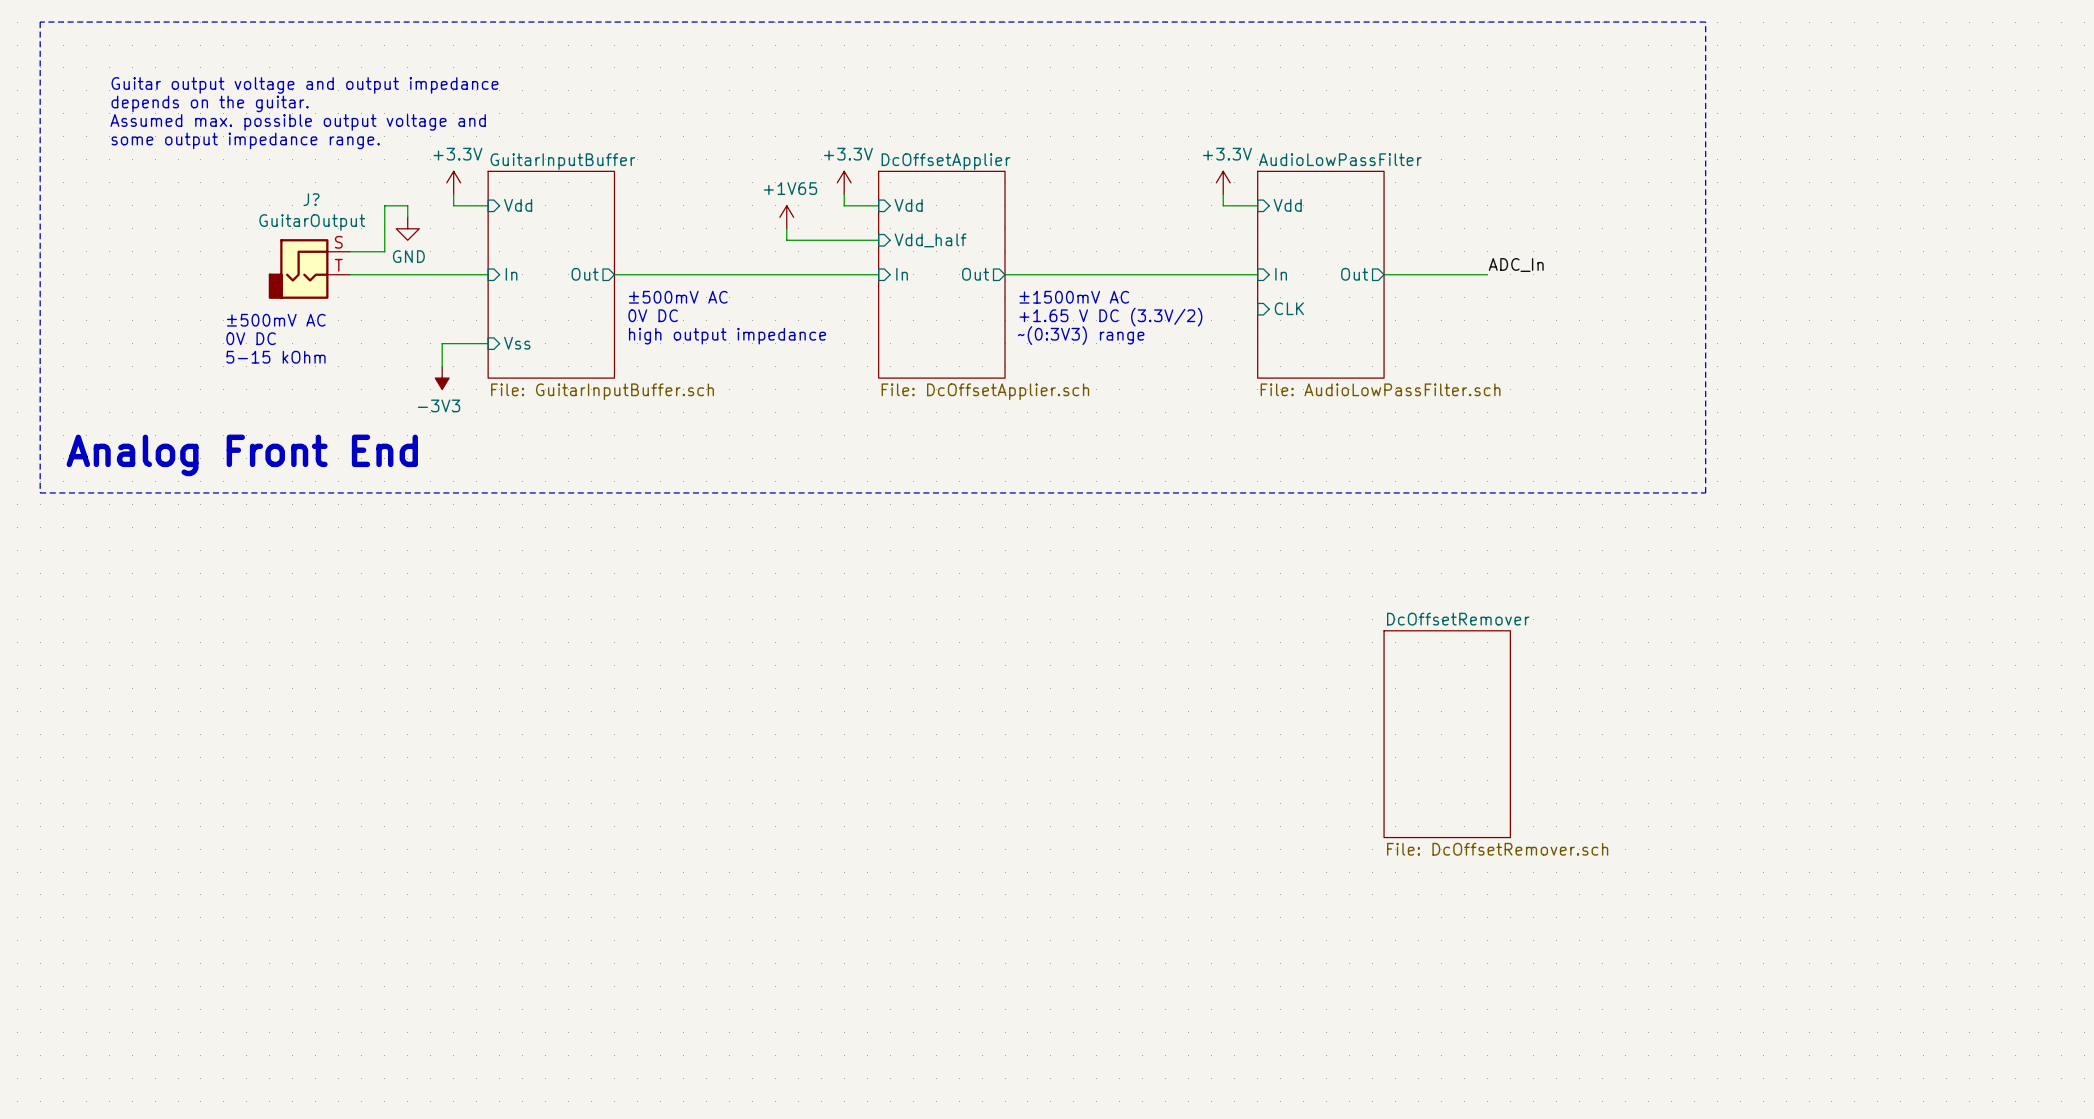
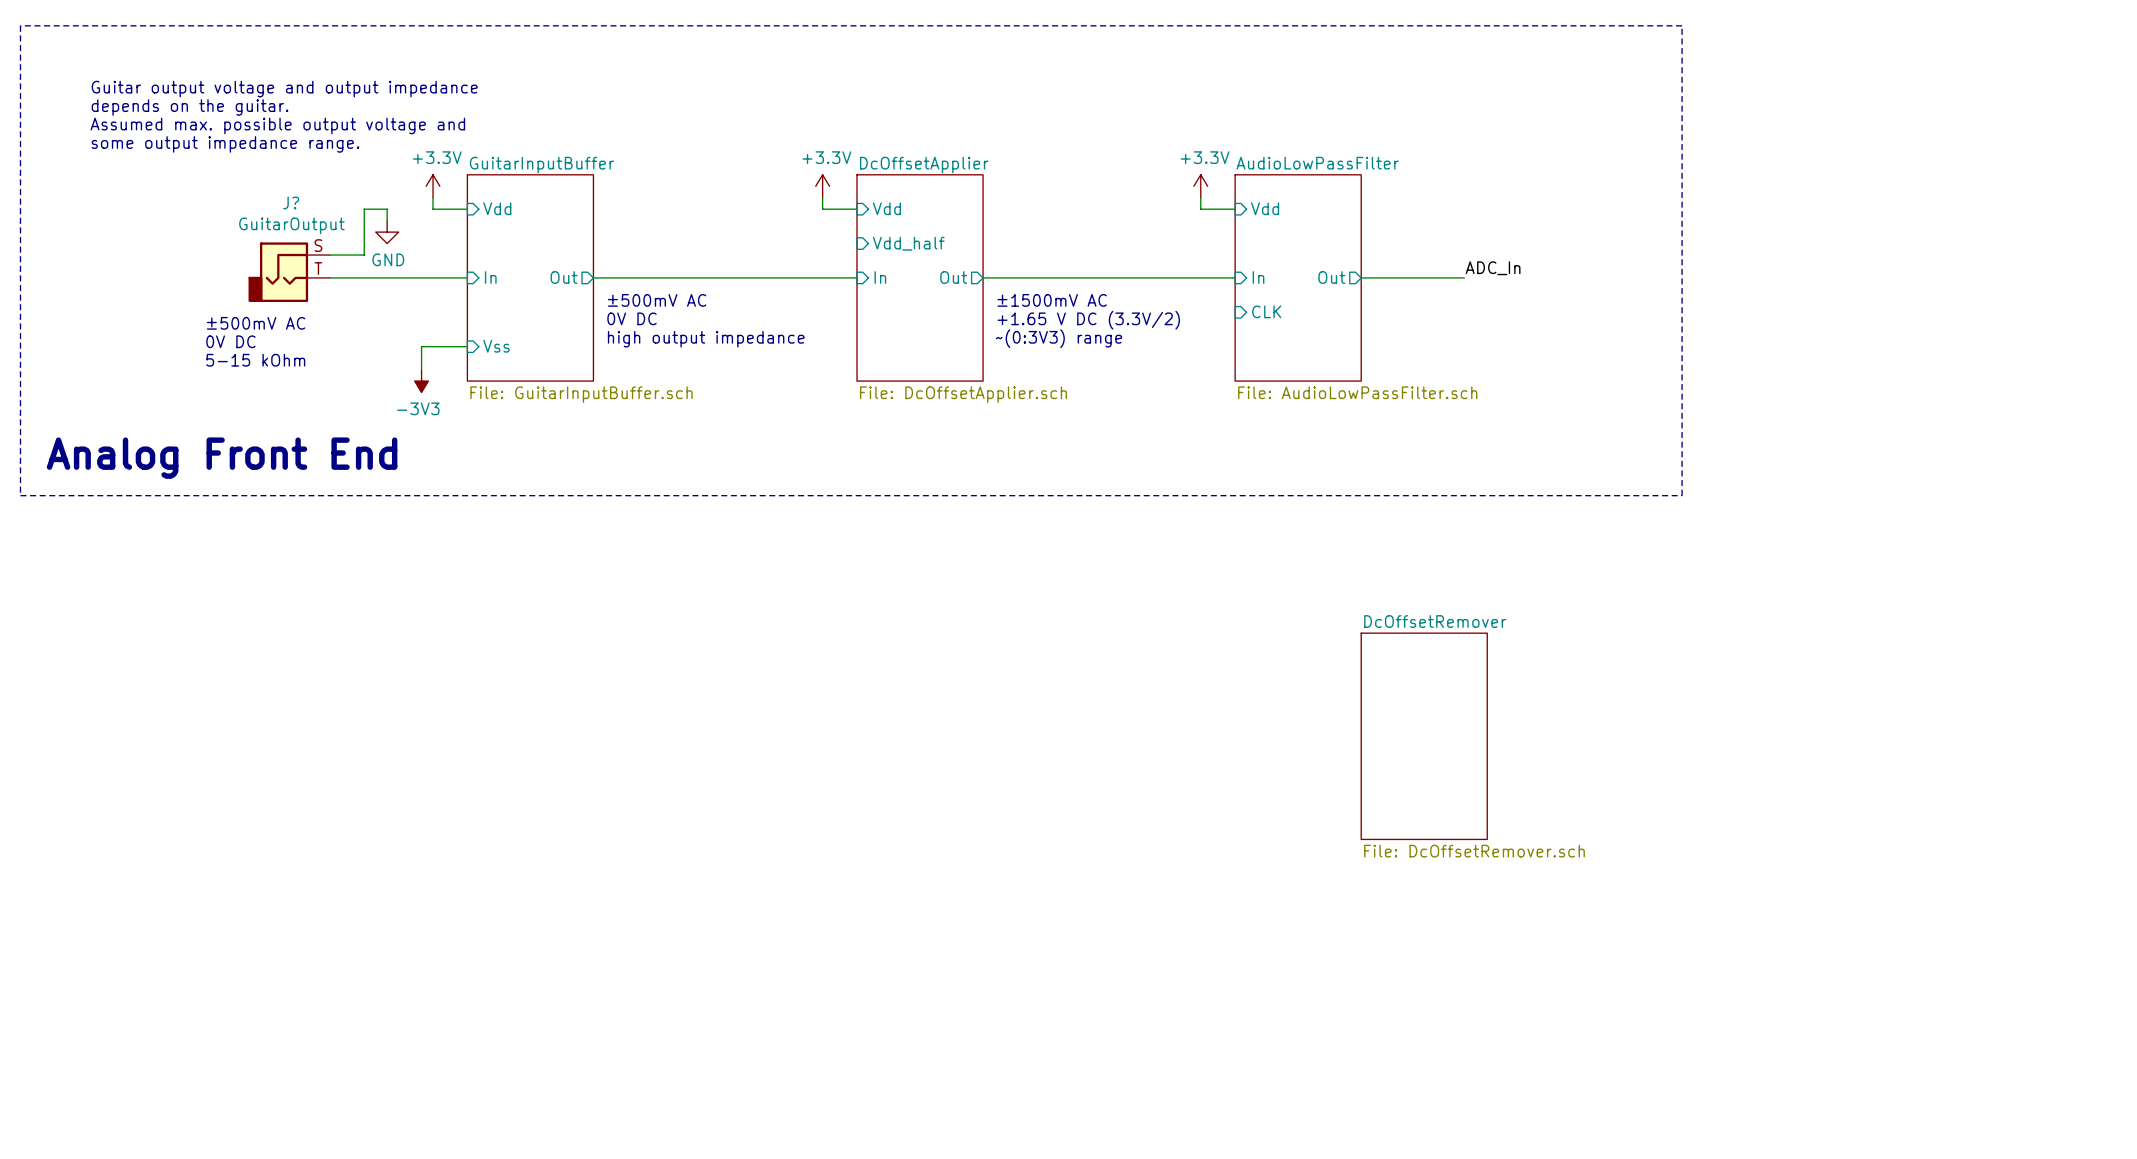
power symbol: +1V65 (786, 217) -> none
wire: (786, 228) (786, 240) (878, 240) -> none

